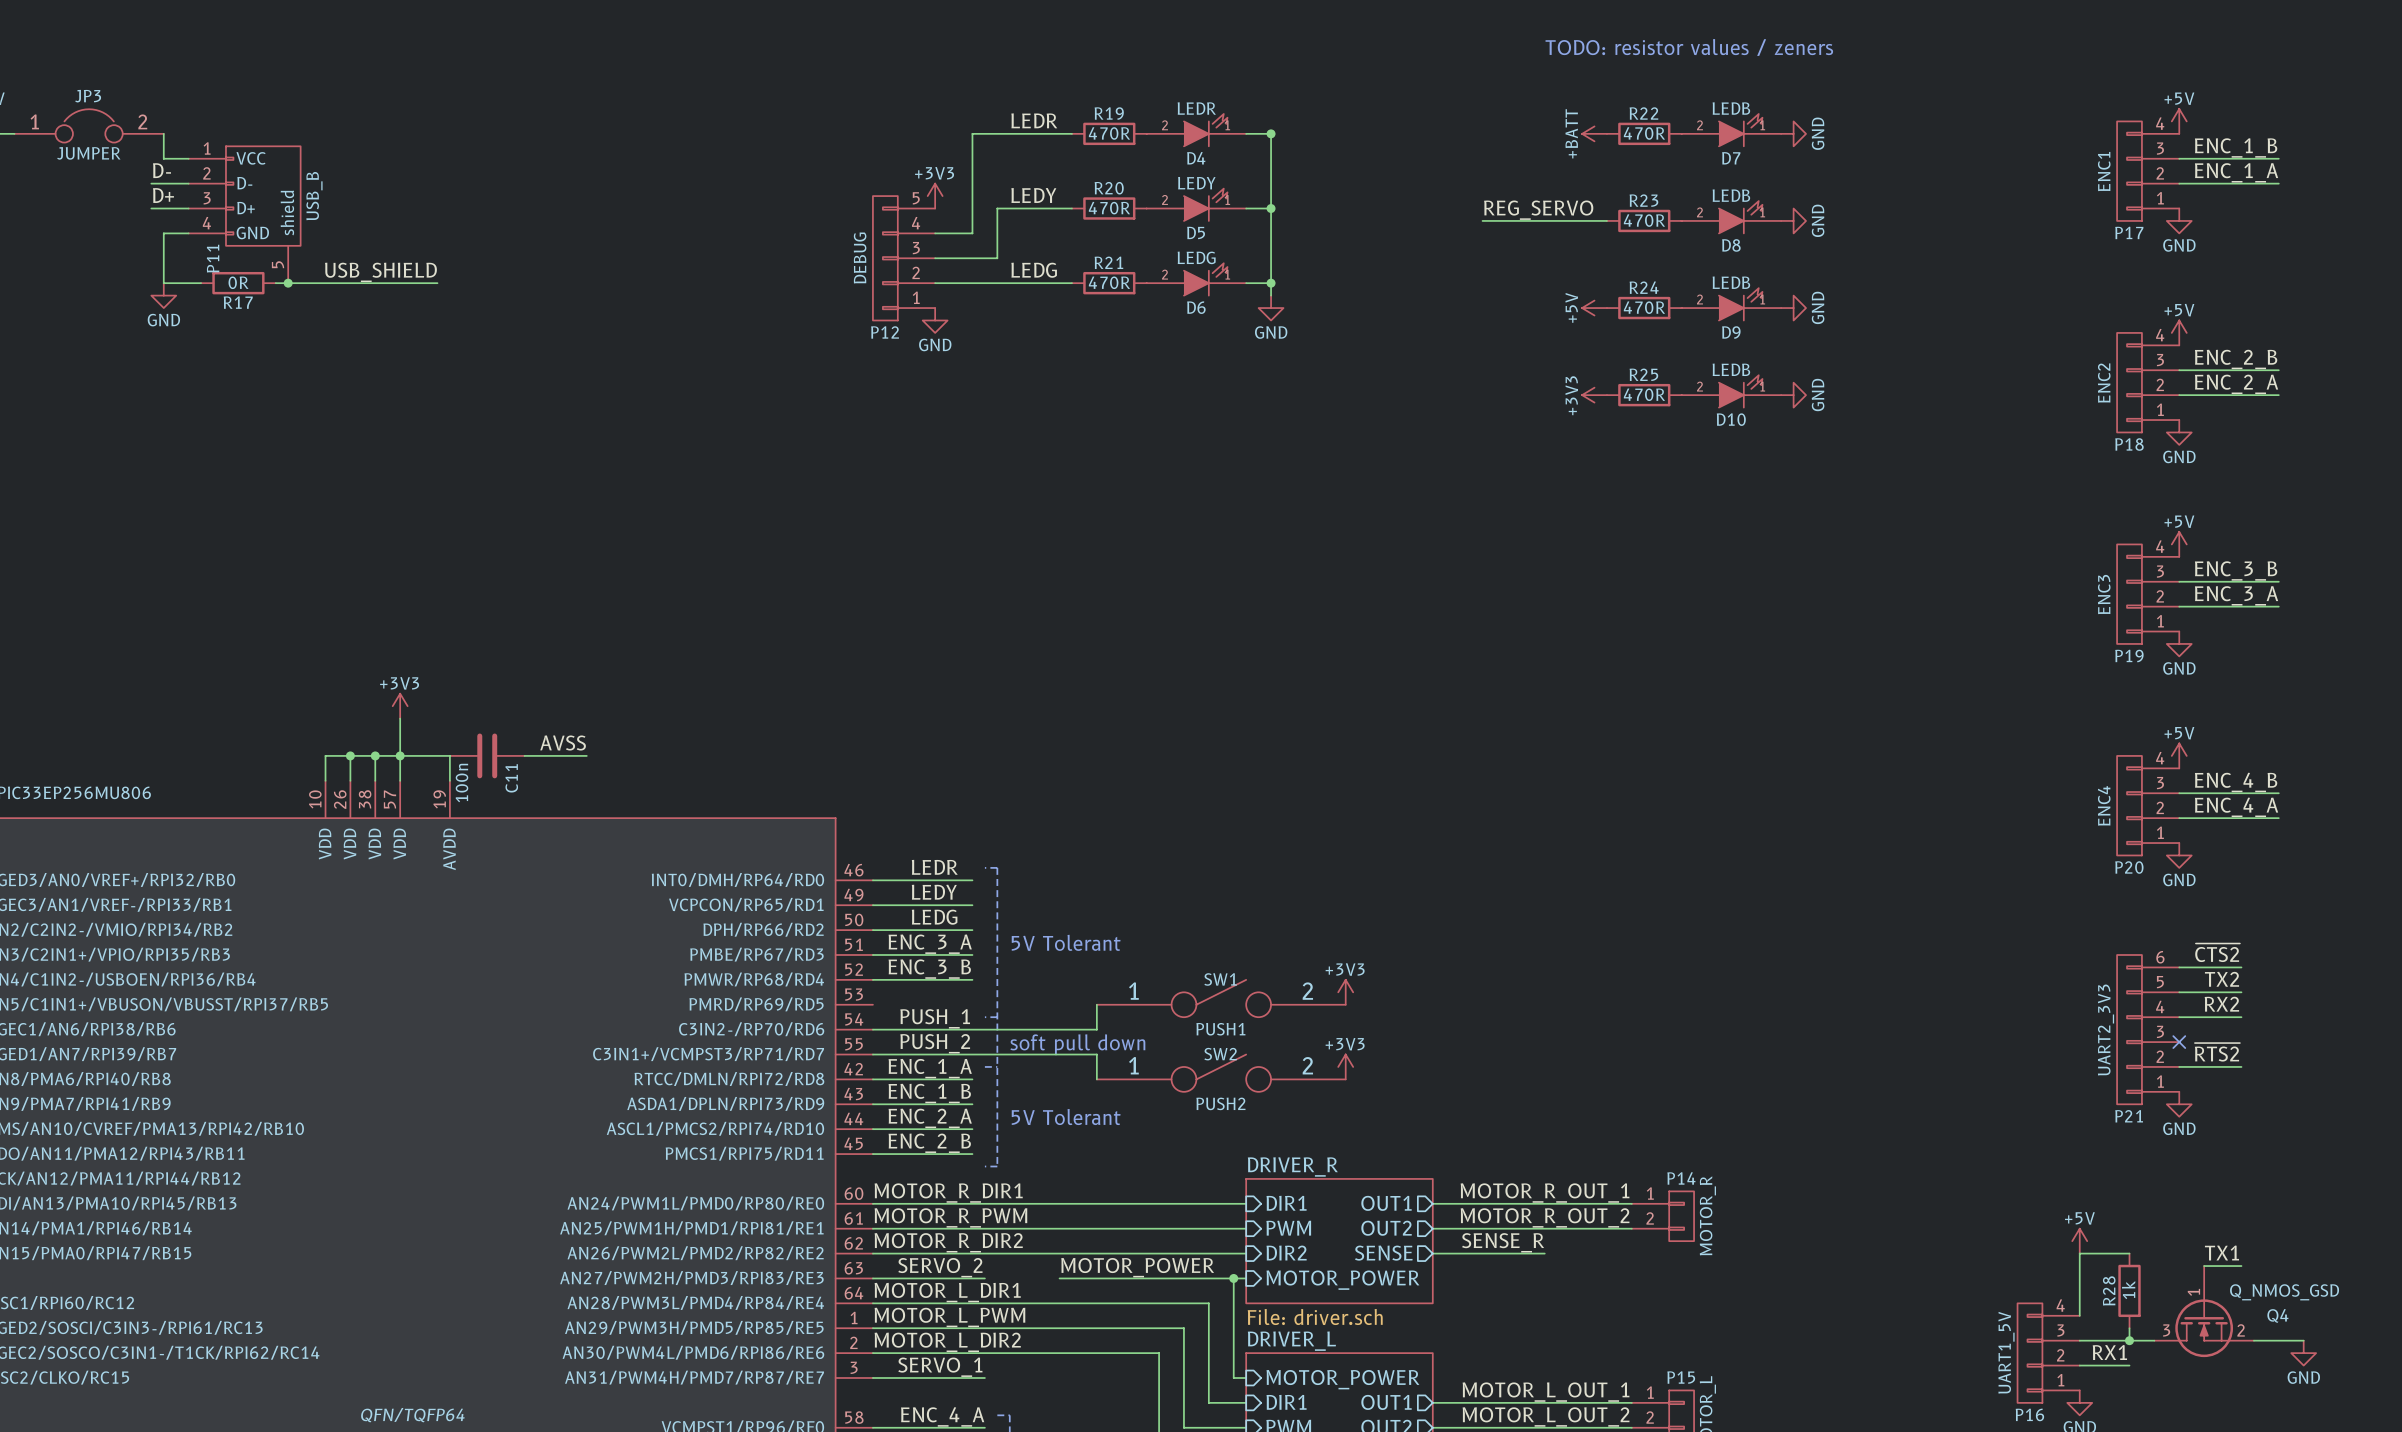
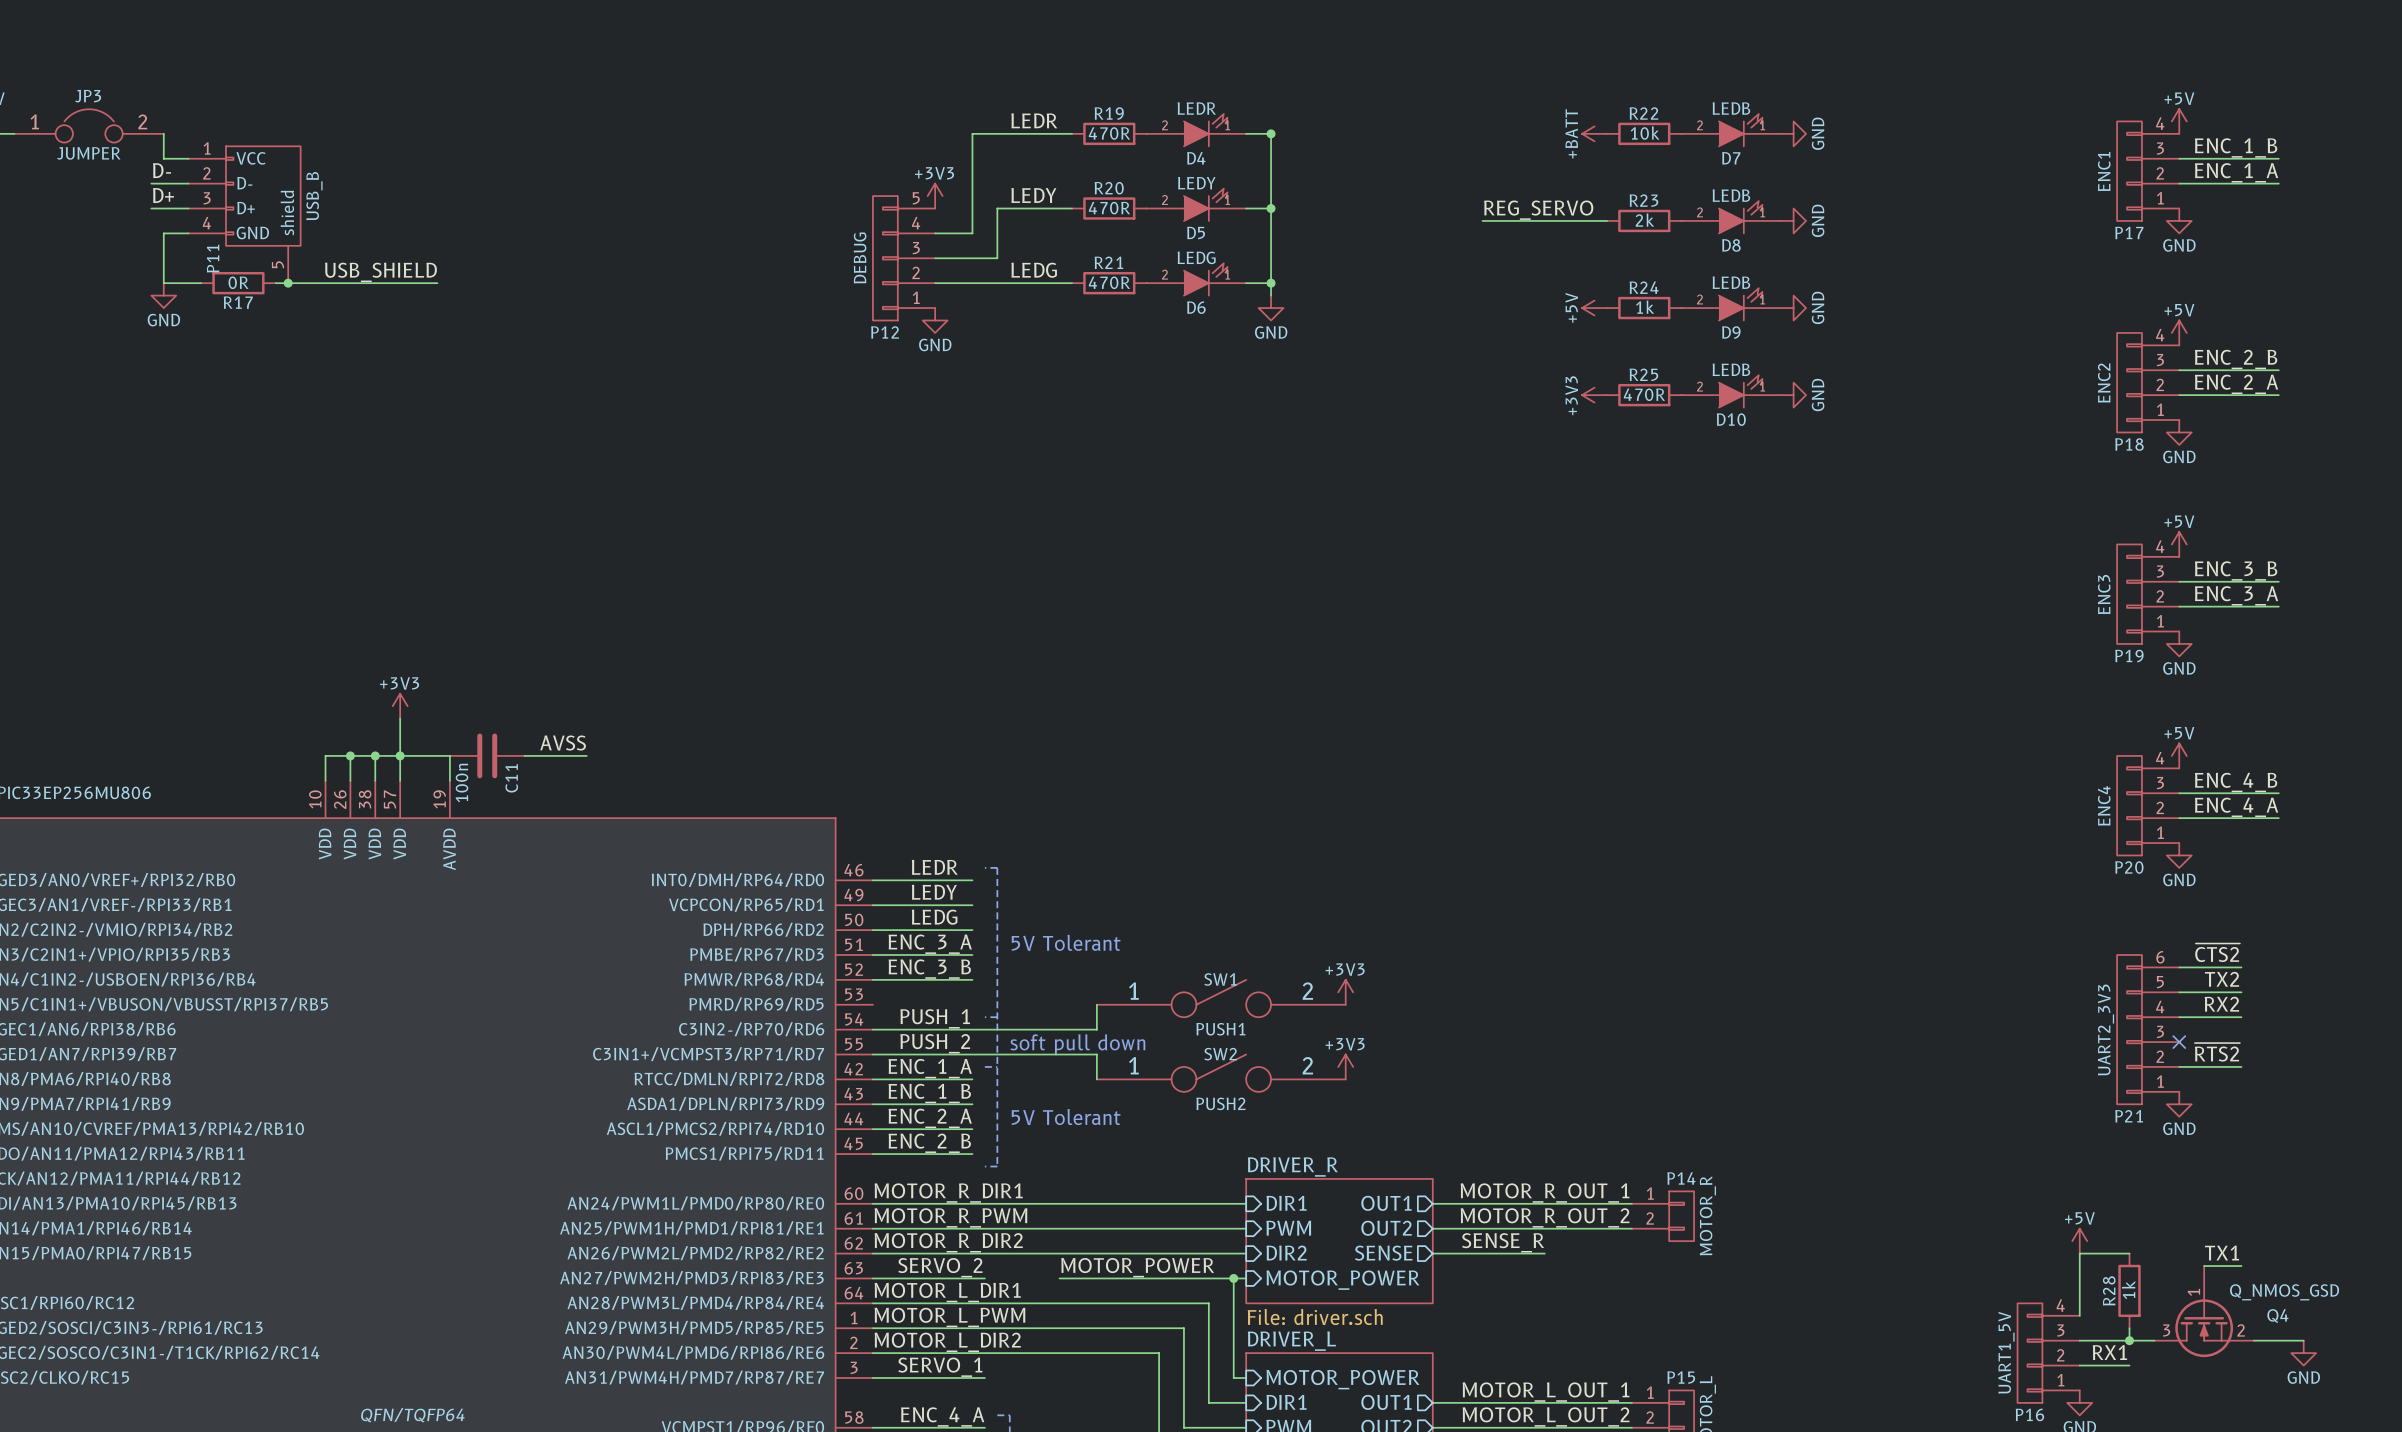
text: TODO: resistor values / zeners (1689, 47) -> none
R22 value: 470R (1644, 133) -> 10k (1645, 133)
R23 value: 470R (1644, 220) -> 2k (1644, 220)
R24 value: 470R (1644, 307) -> 1k (1645, 307)

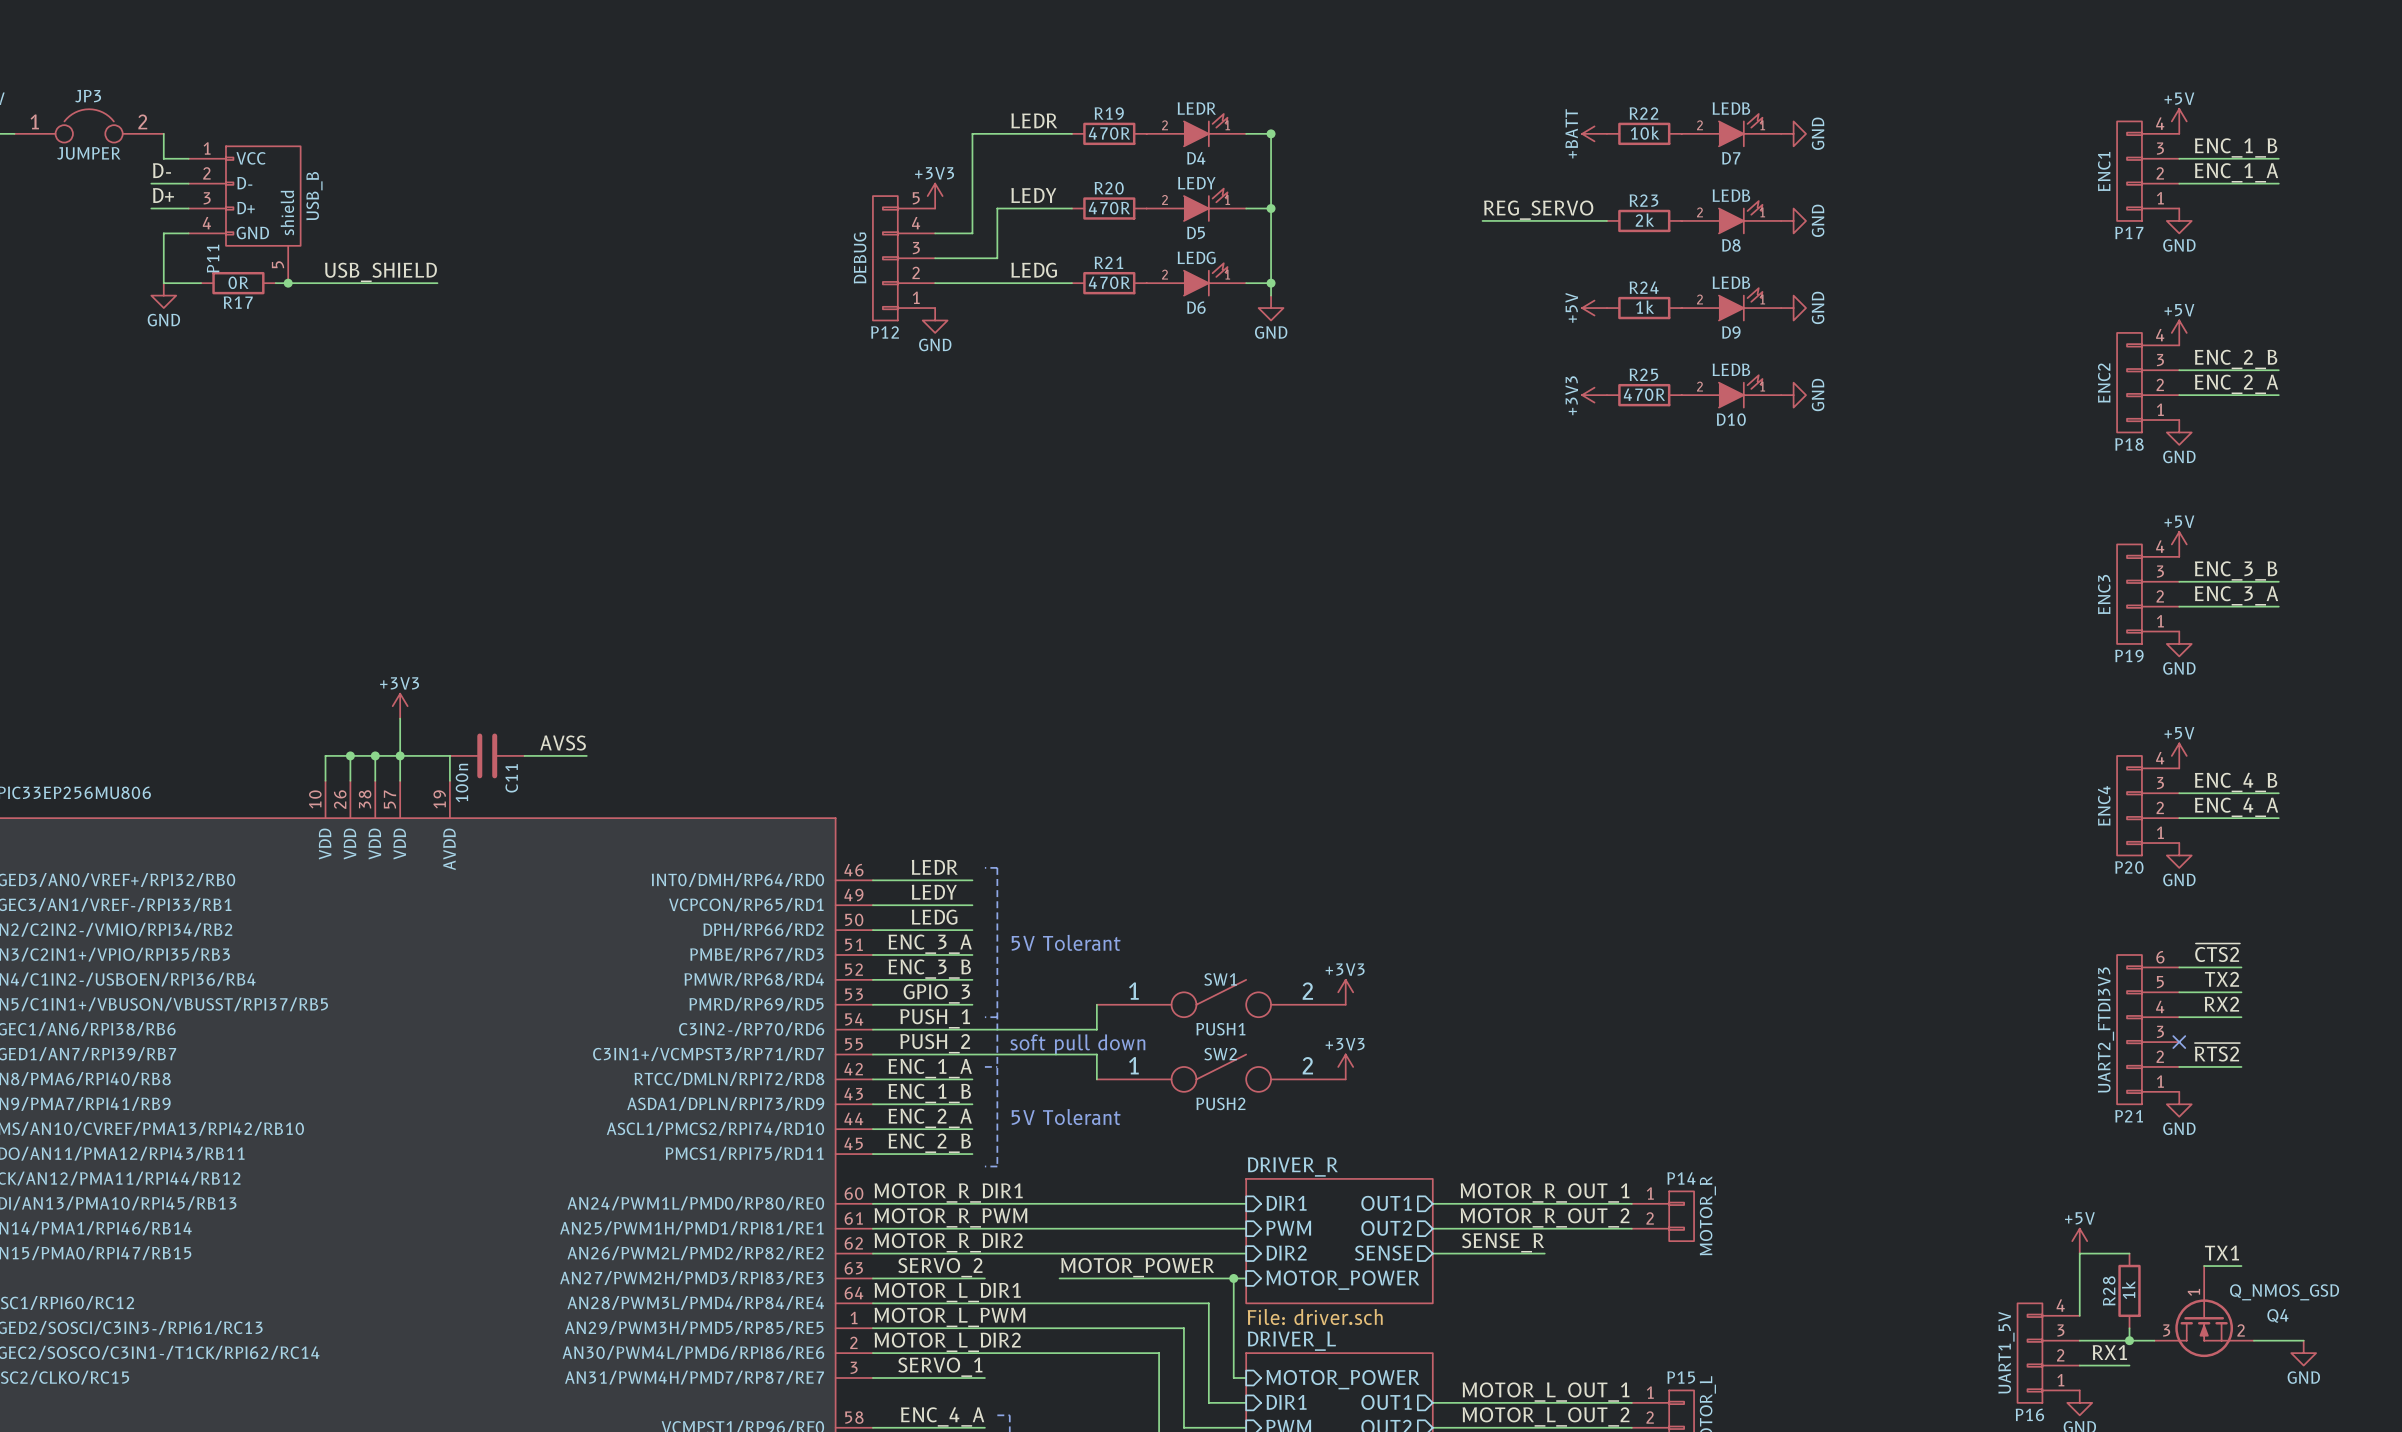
label: none -> GPIO_3 (936, 993)
wire: none -> (872, 1004) (972, 1004)
P21 value: UART2_3V3 (2106, 1030) -> UART2_FTDI3V3 (2106, 1030)
part text: QFN/TQFP64 (412, 1415) -> none

